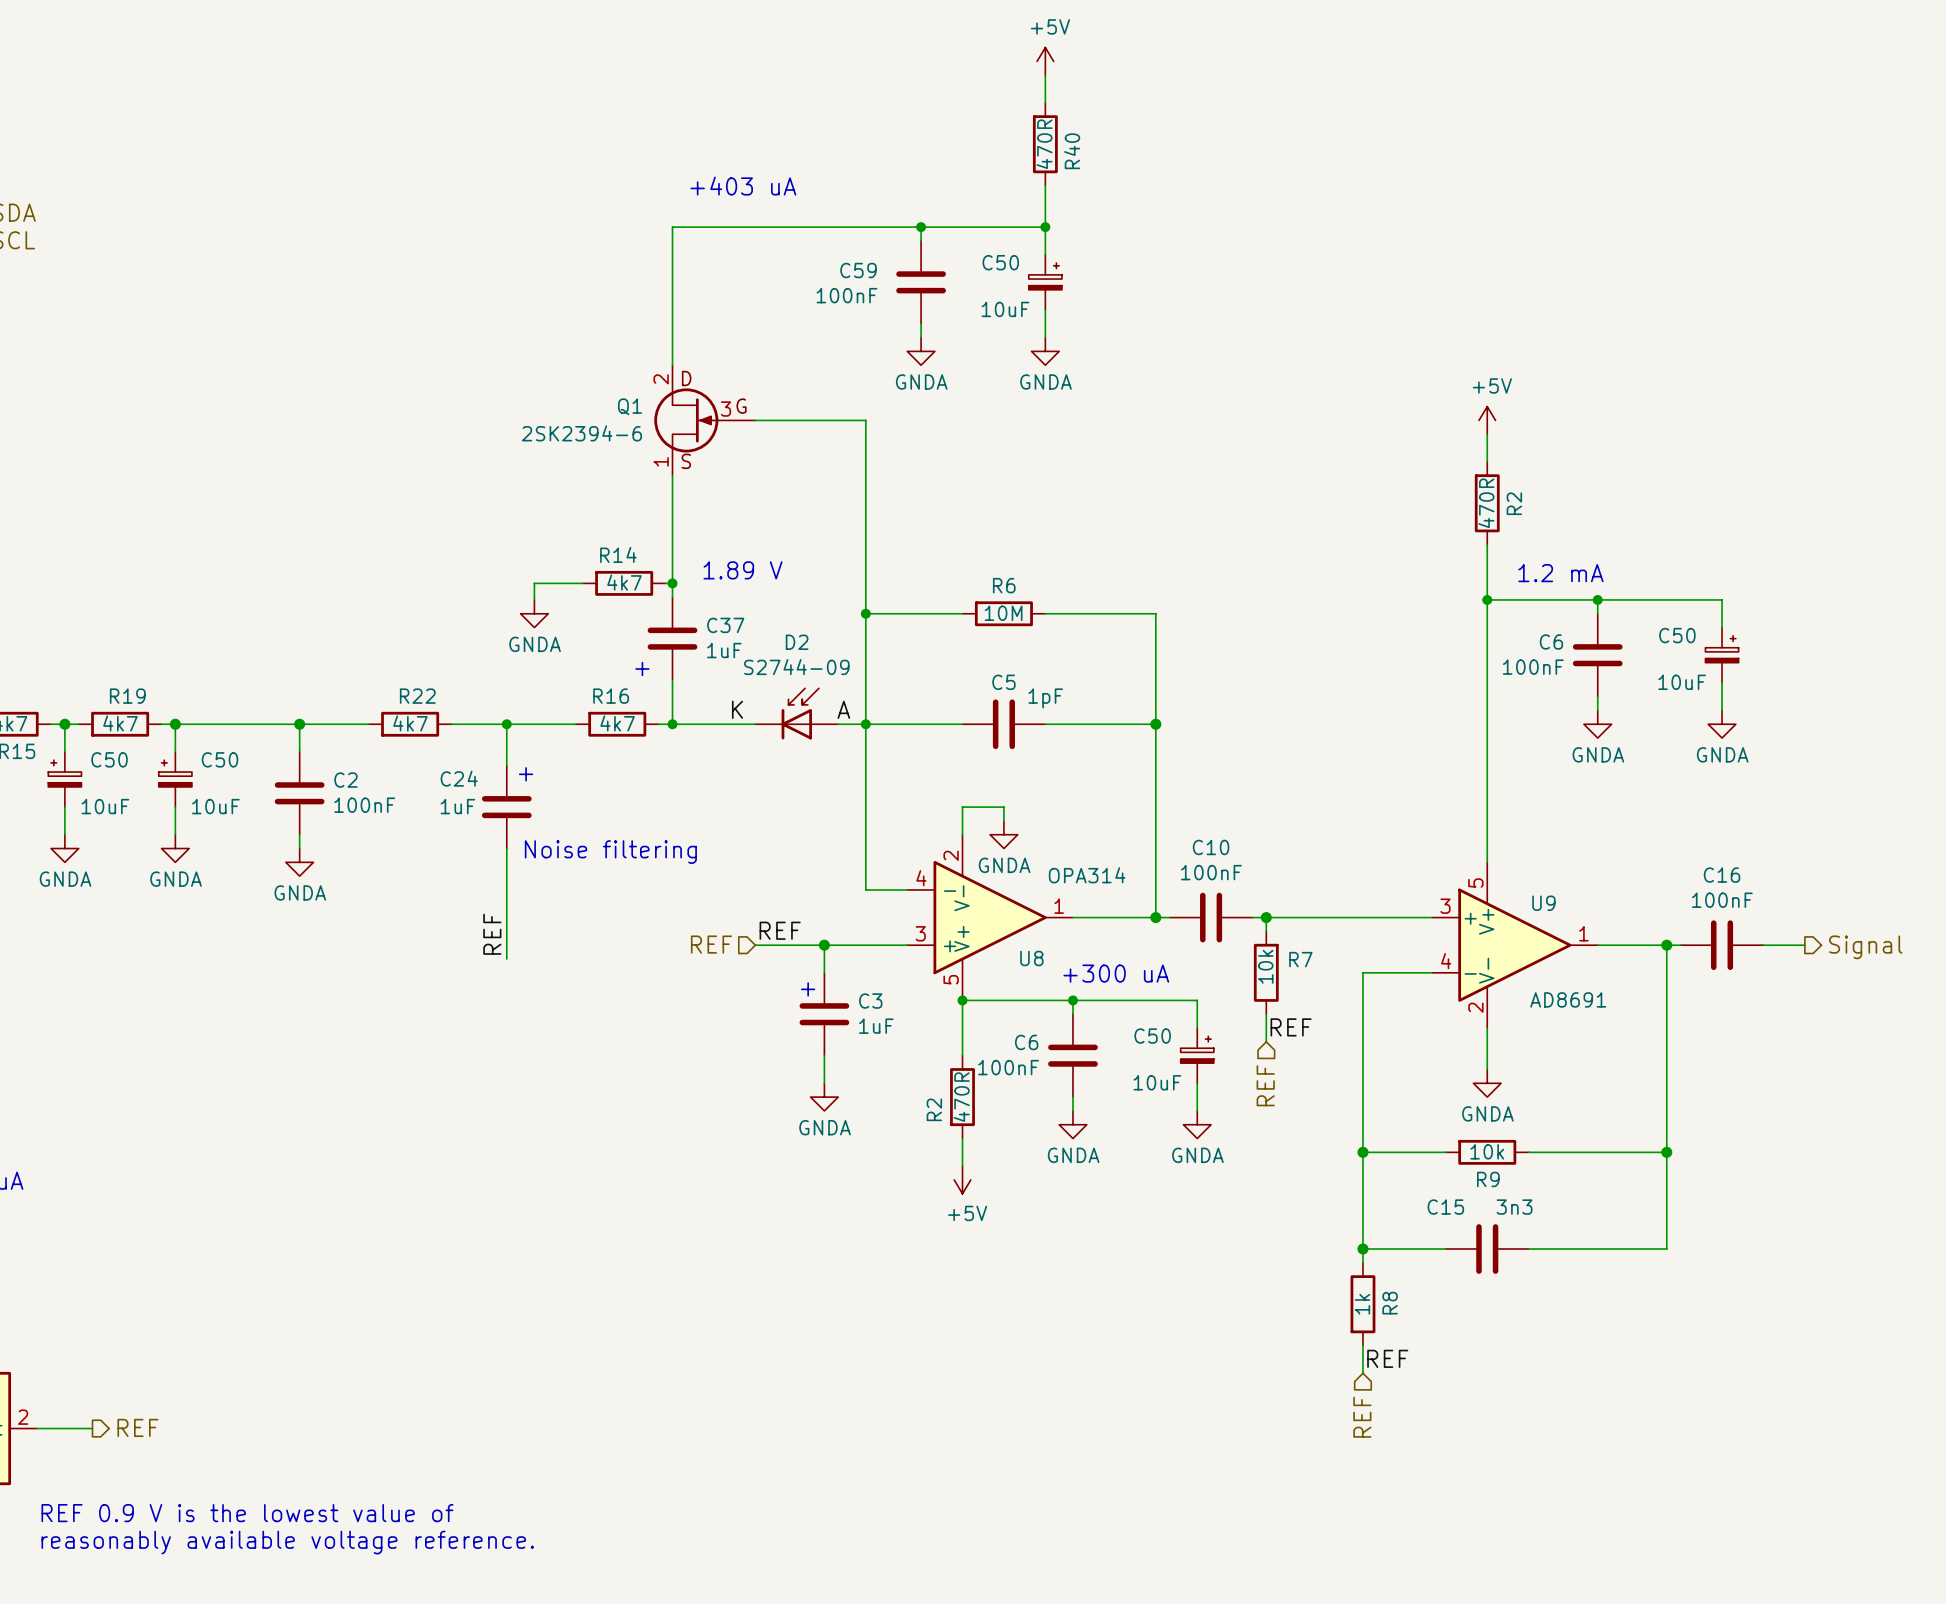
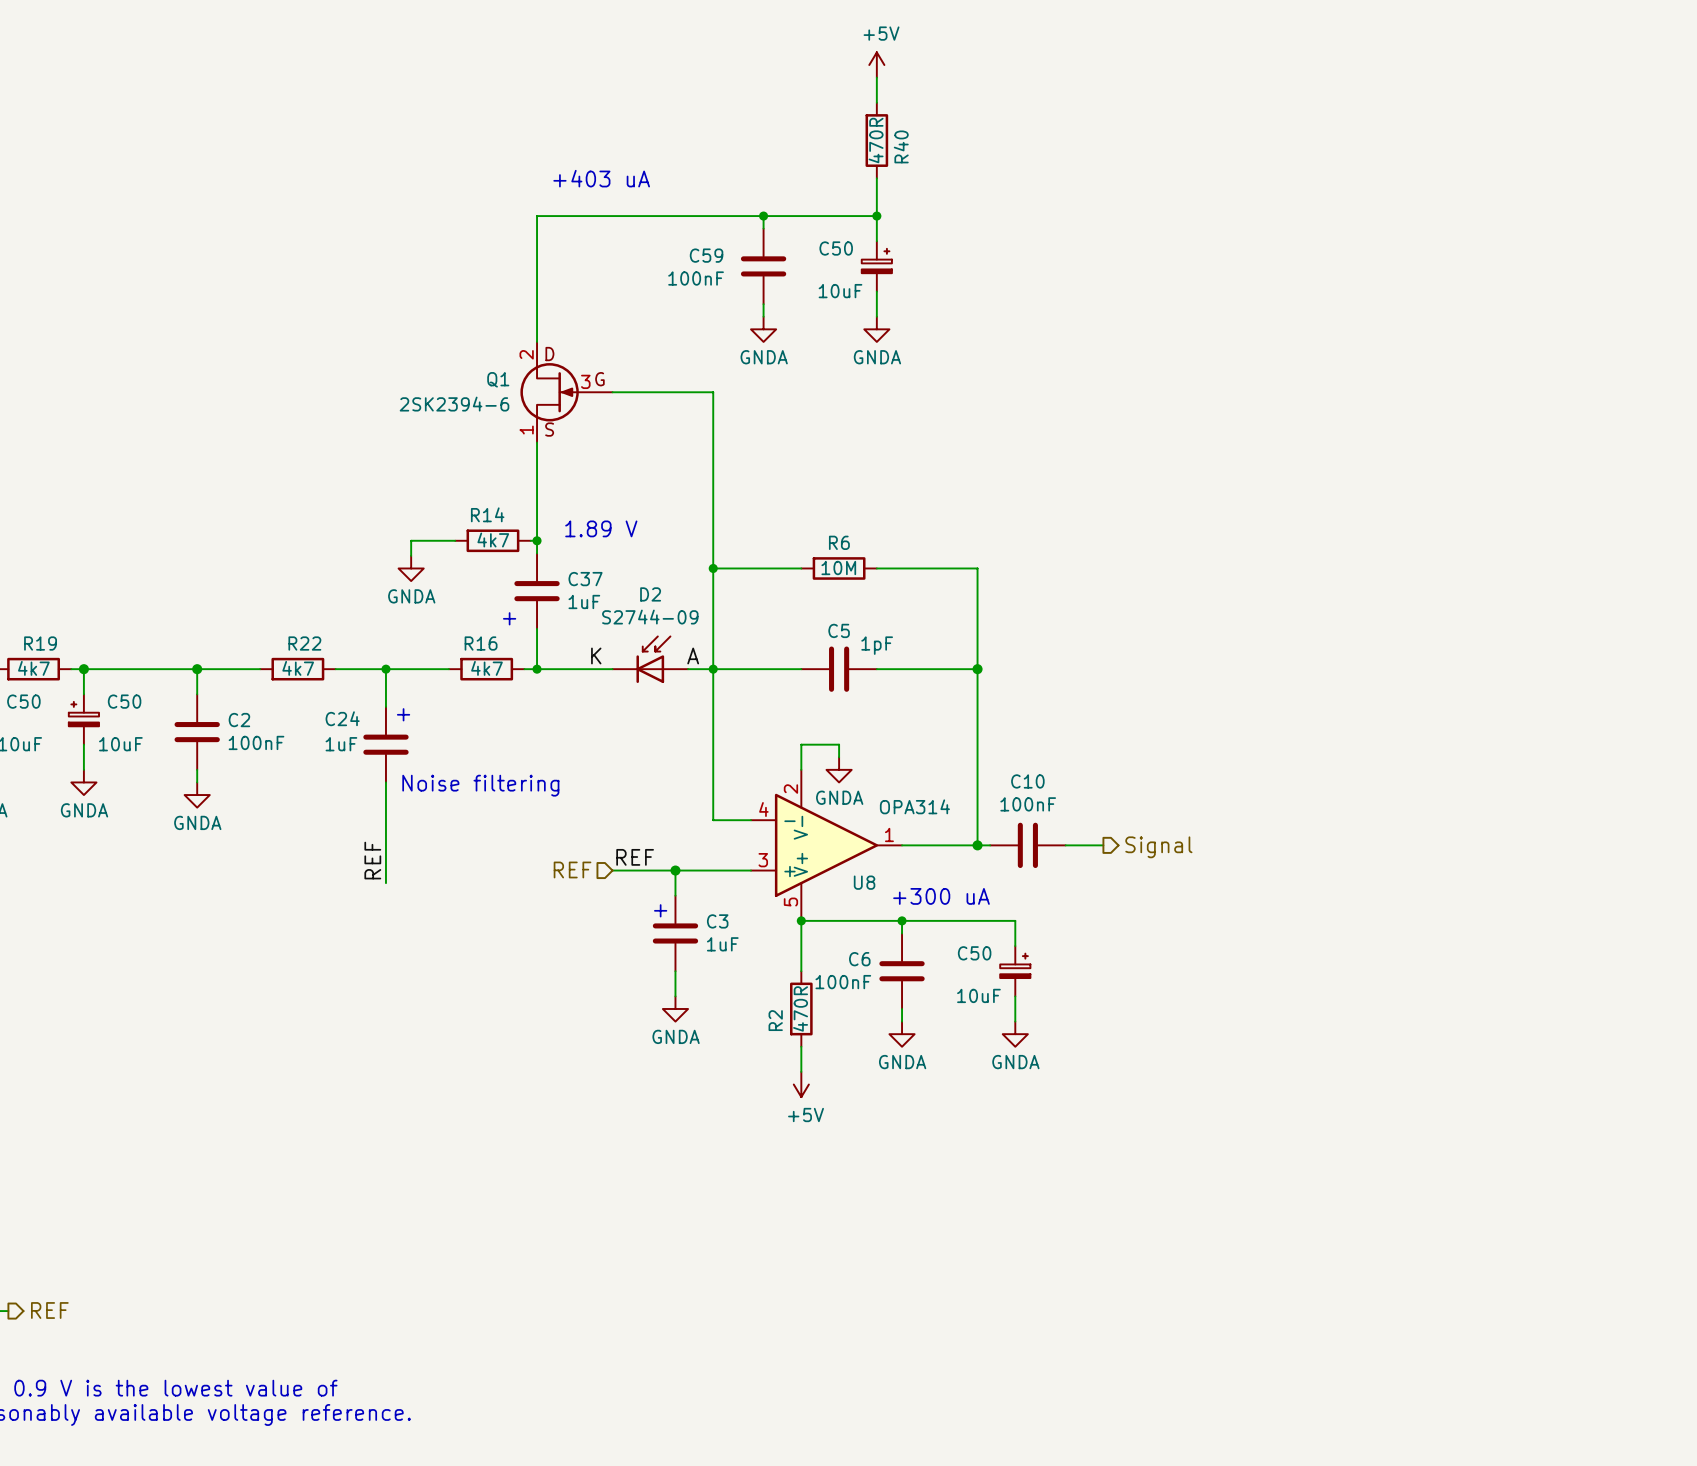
power symbol: +5V (1487, 420) -> none
wire: (1487, 434) (1487, 461) -> none
R2: 470R (1487, 503) -> none
wire: (1487, 544) (1487, 862) -> none
text: 1.2 mA (1560, 573) -> none
wire: (1487, 599) (1722, 599) (1722, 627) -> none
junction: (1487, 599) -> none
wire: (1597, 599) (1597, 613) -> none
junction: (1597, 599) -> none
C6: 100nF (1597, 655) -> none
C50: 10uF (1722, 655) -> none
wire: (1722, 682) (1722, 710) -> none
wire: (1597, 696) (1597, 710) -> none
power symbol: GNDA (1597, 724) -> none
power symbol: GNDA (1722, 724) -> none
wire: (1266, 917) (1266, 931) -> none
junction: (1266, 917) -> none
wire: (1293, 917) (1432, 917) -> none
hierarchical label: none -> Signal (1158, 847)
U9: AD8691 (1514, 945) -> none
wire: (1597, 945) (1680, 945) -> none
wire: (1666, 945) (1666, 1249) (1528, 1249) -> none
junction: (1666, 945) -> none
C16: 100nF (1722, 945) -> none
wire: (1763, 945) (1804, 945) -> none
hierarchical label: Signal (1865, 947) -> none
R7: 10k (1266, 972) -> none
wire: (1432, 972) (1362, 972) (1362, 1262) -> none
wire: (1266, 1014) (1266, 1041) -> none
label: REF (1291, 1027) -> none
wire: (1487, 1028) (1487, 1069) -> none
power symbol: GNDA (1487, 1083) -> none
hierarchical label: REF (1265, 1085) -> none
wire: (1362, 1152) (1445, 1152) -> none
junction: (1362, 1152) -> none
R9: 10k (1487, 1152) -> none
wire: (1528, 1152) (1666, 1152) -> none
junction: (1666, 1152) -> none
wire: (1362, 1249) (1445, 1249) -> none
junction: (1362, 1249) -> none
C15: 3n3 (1487, 1249) -> none
R8: 1k (1362, 1304) -> none
wire: (1362, 1345) (1362, 1373) -> none
label: REF (1387, 1358) -> none
hierarchical label: REF (1362, 1417) -> none

